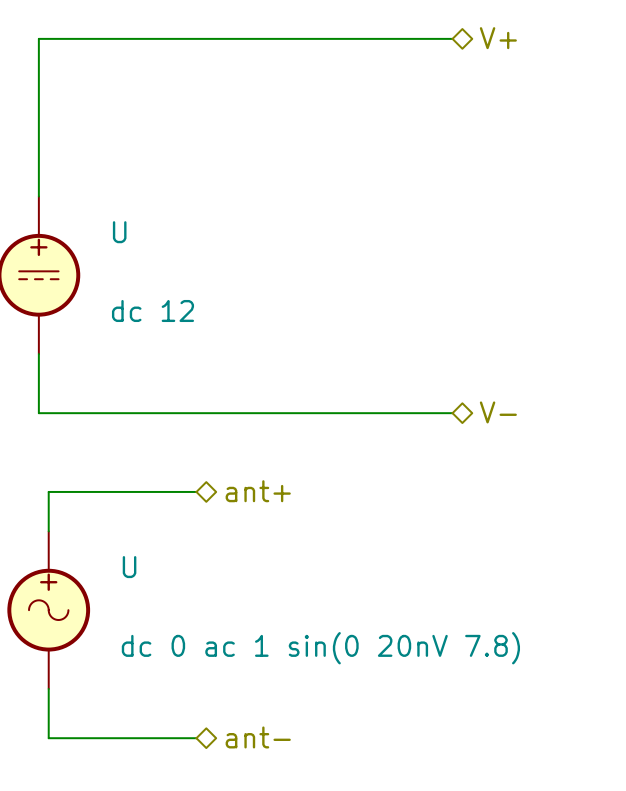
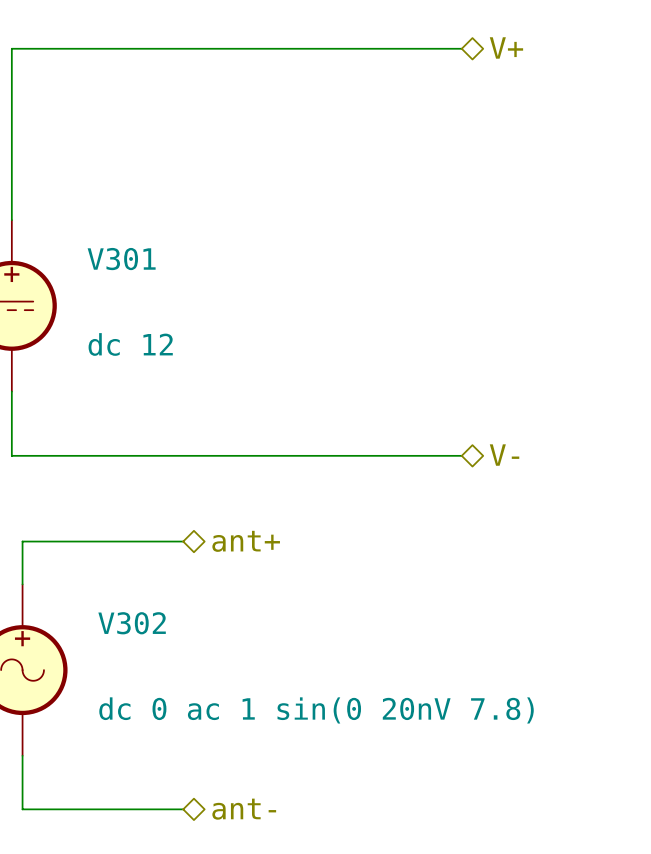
U name: U (119, 232) -> V301 (121, 259)
U name: U (129, 567) -> V302 (132, 623)

